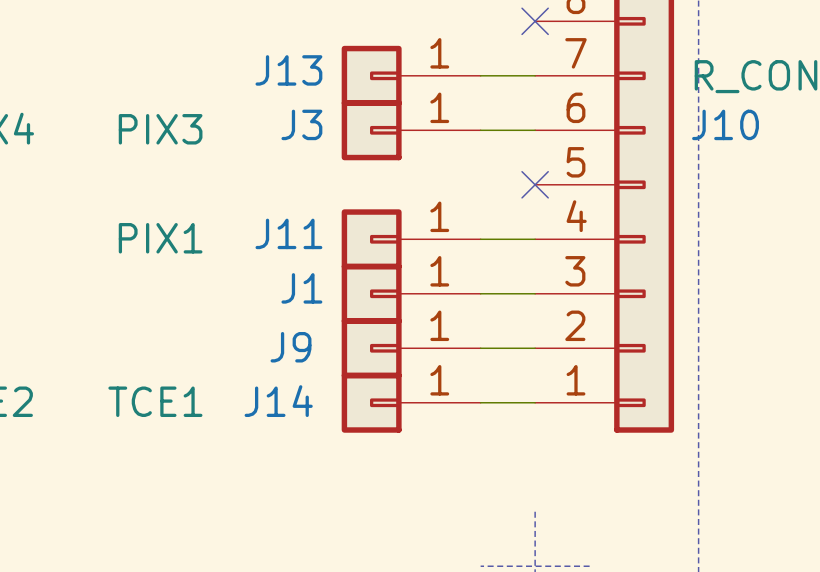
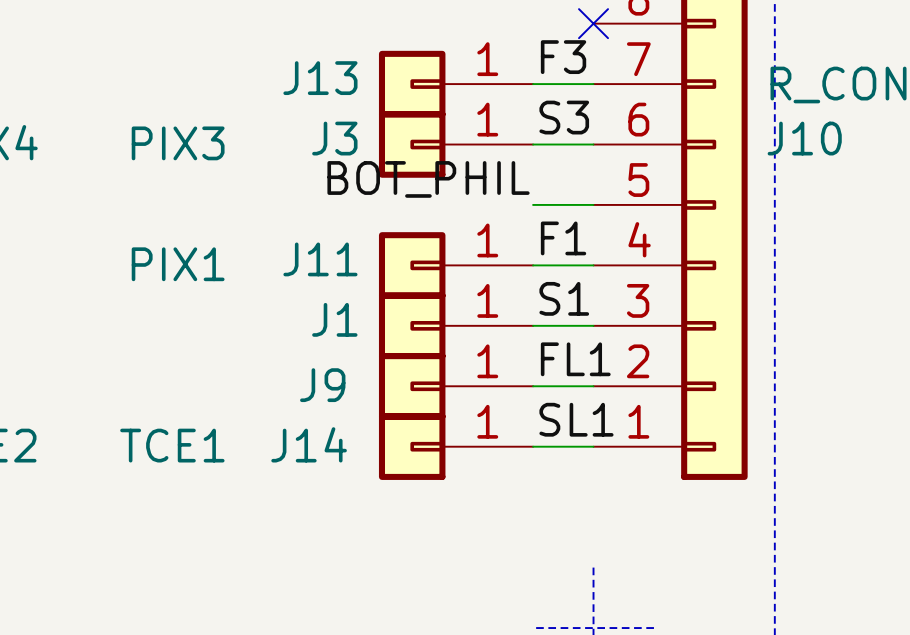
label: none -> F3 (563, 57)
label: none -> S3 (564, 117)
label: none -> BOT_PHIL (428, 179)
wire: none -> (533, 204) (593, 204)
no-connect mark: (535, 184) -> none
label: none -> F1 (563, 238)
label: none -> S1 (564, 298)
label: none -> FL1 (575, 359)
label: none -> SL1 (576, 419)

